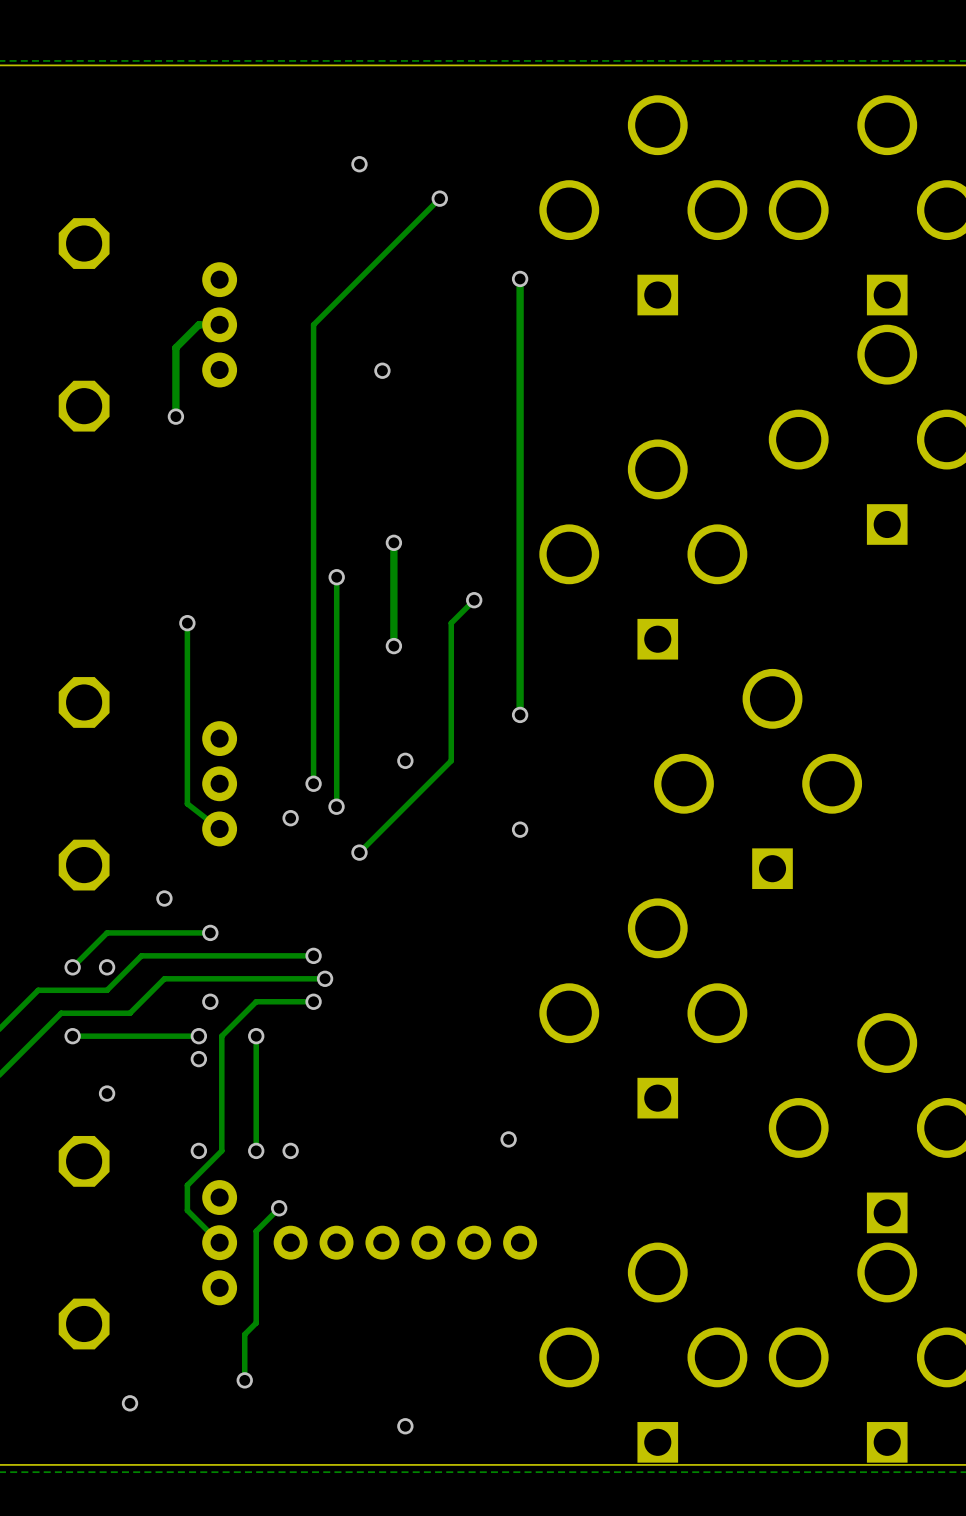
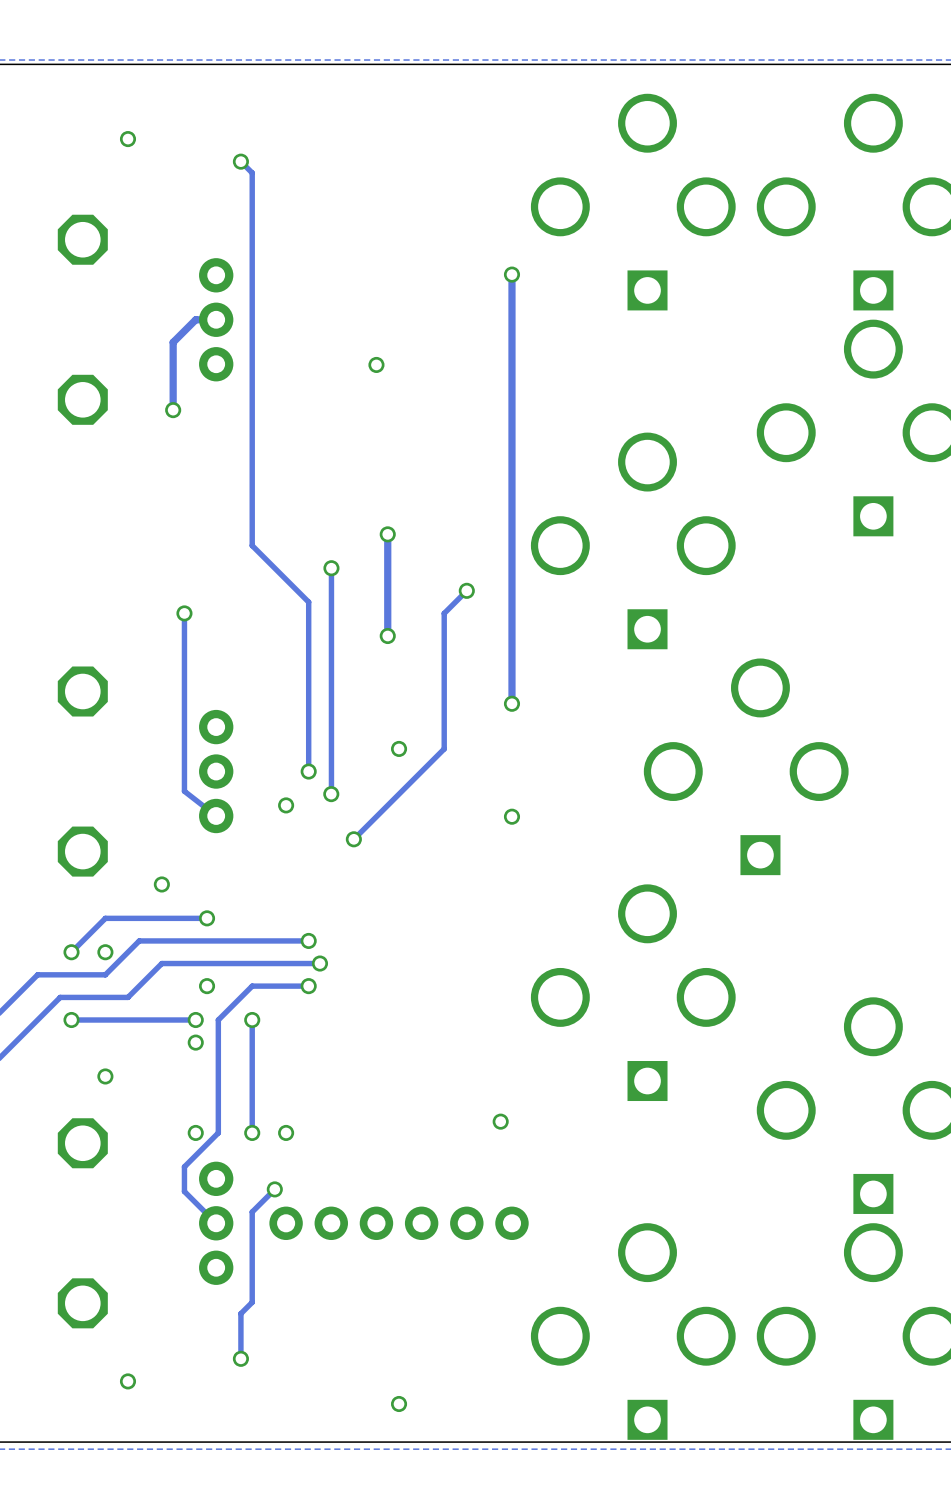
via: none -> (127, 139)
via: none -> (240, 161)
via: (359, 164) -> none
track: (439, 198) (313, 324) (313, 611) -> (240, 161) (252, 172) (252, 545) (308, 602)
via: (439, 198) -> none

